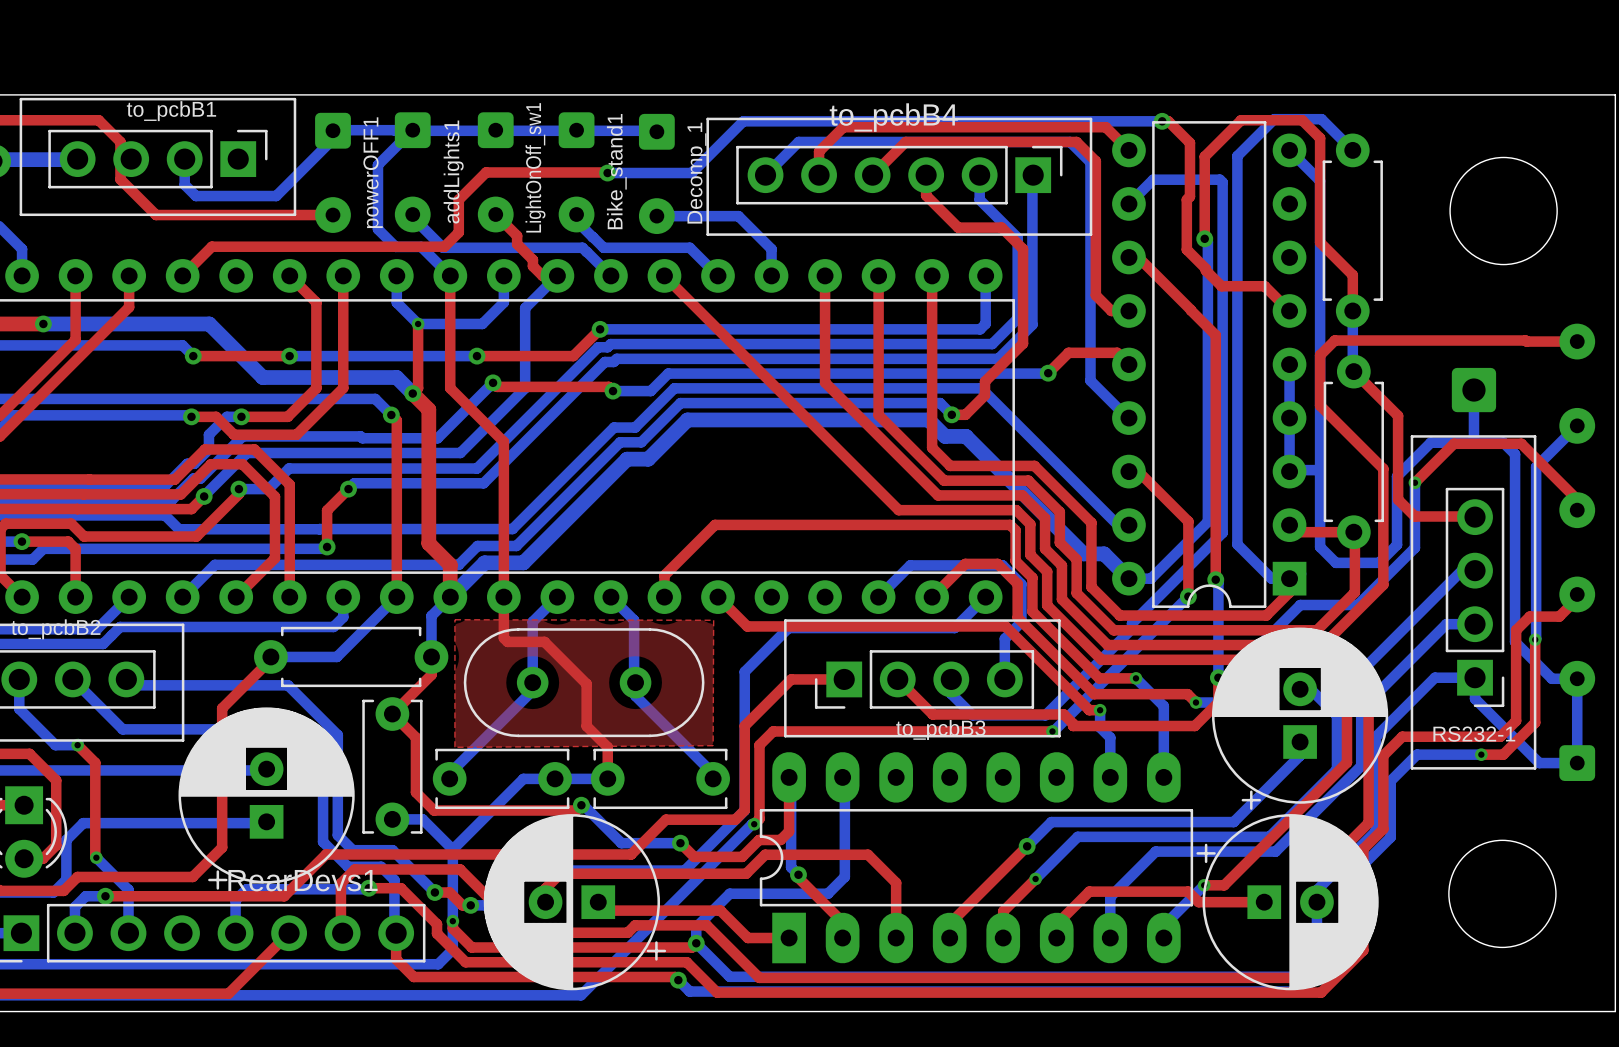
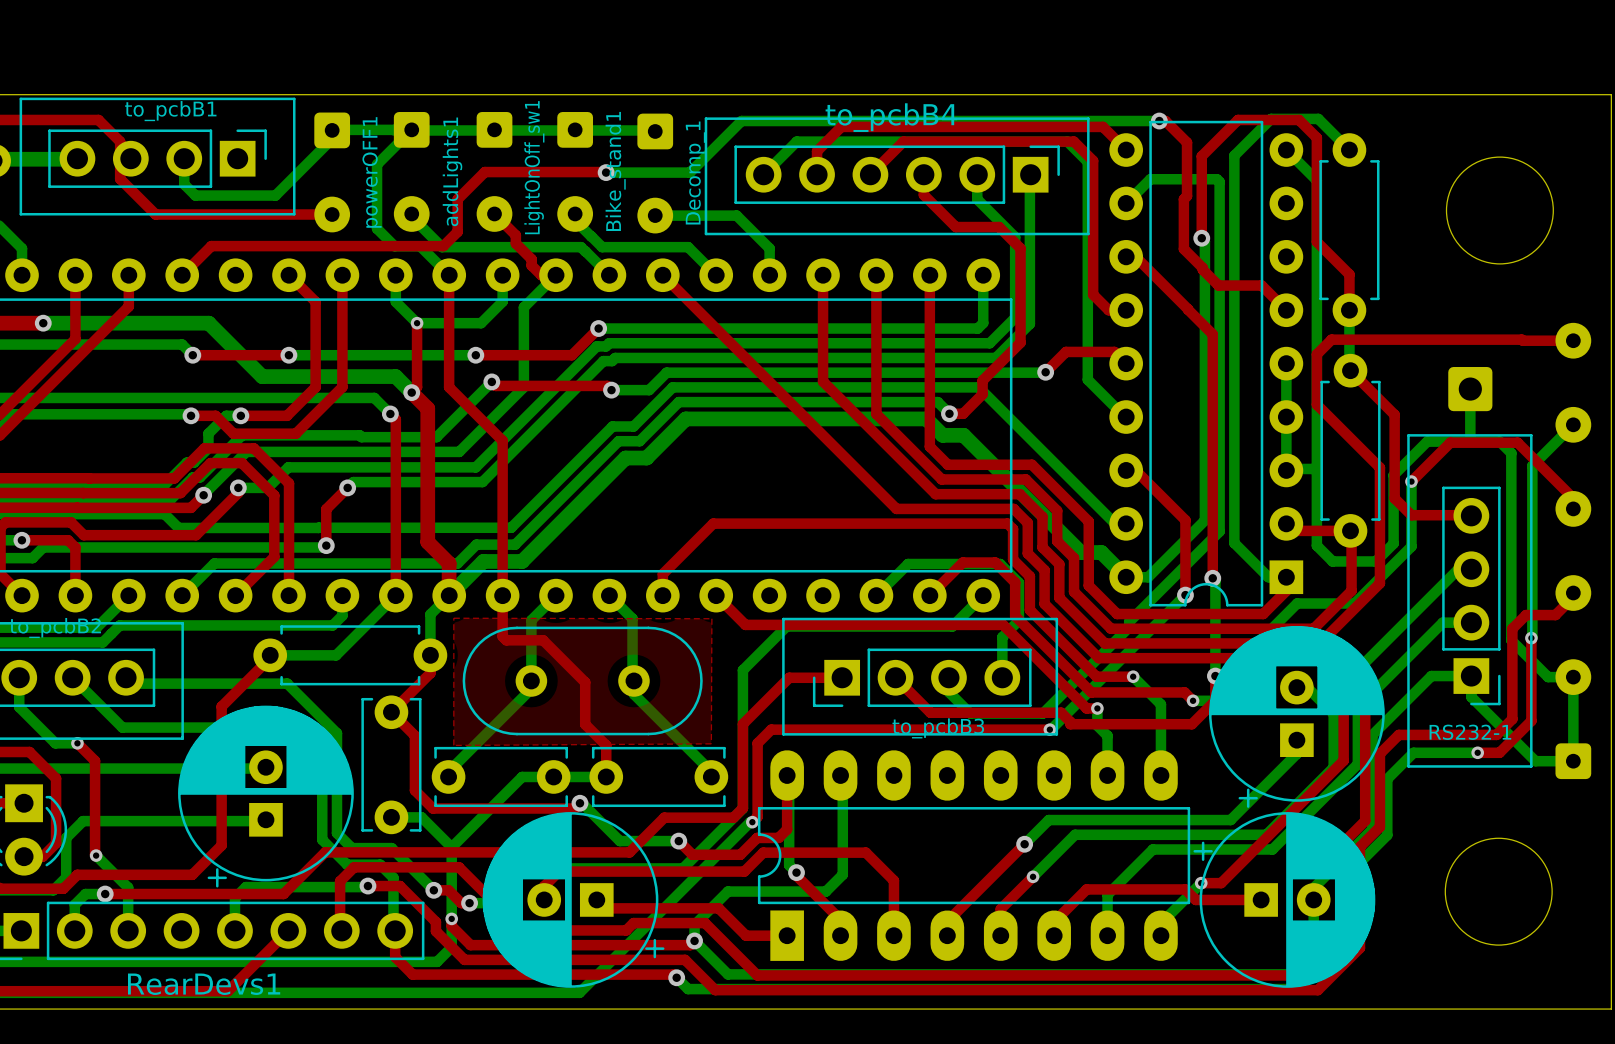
RearDevs1 name position: RearDevs1 (302, 880) -> RearDevs1 (204, 984)

